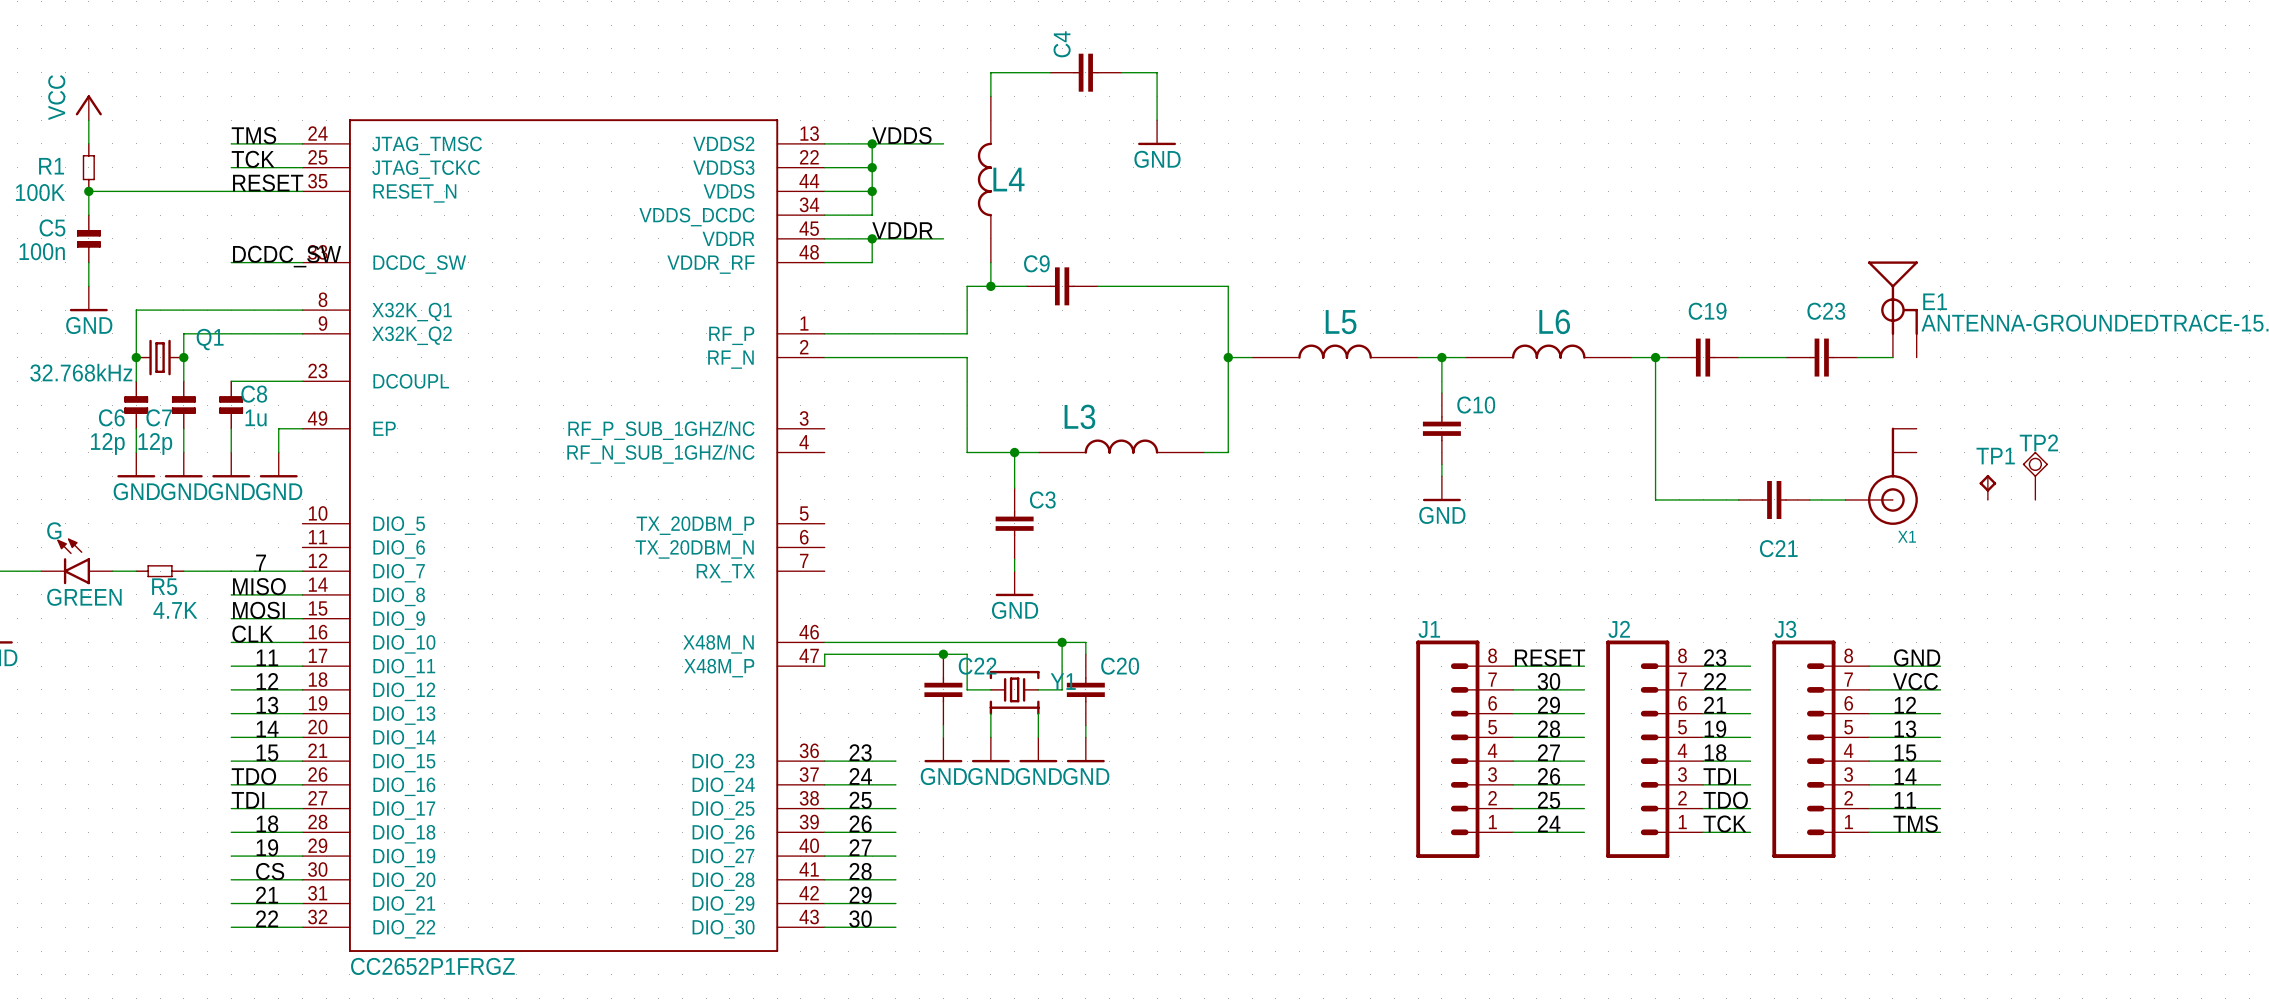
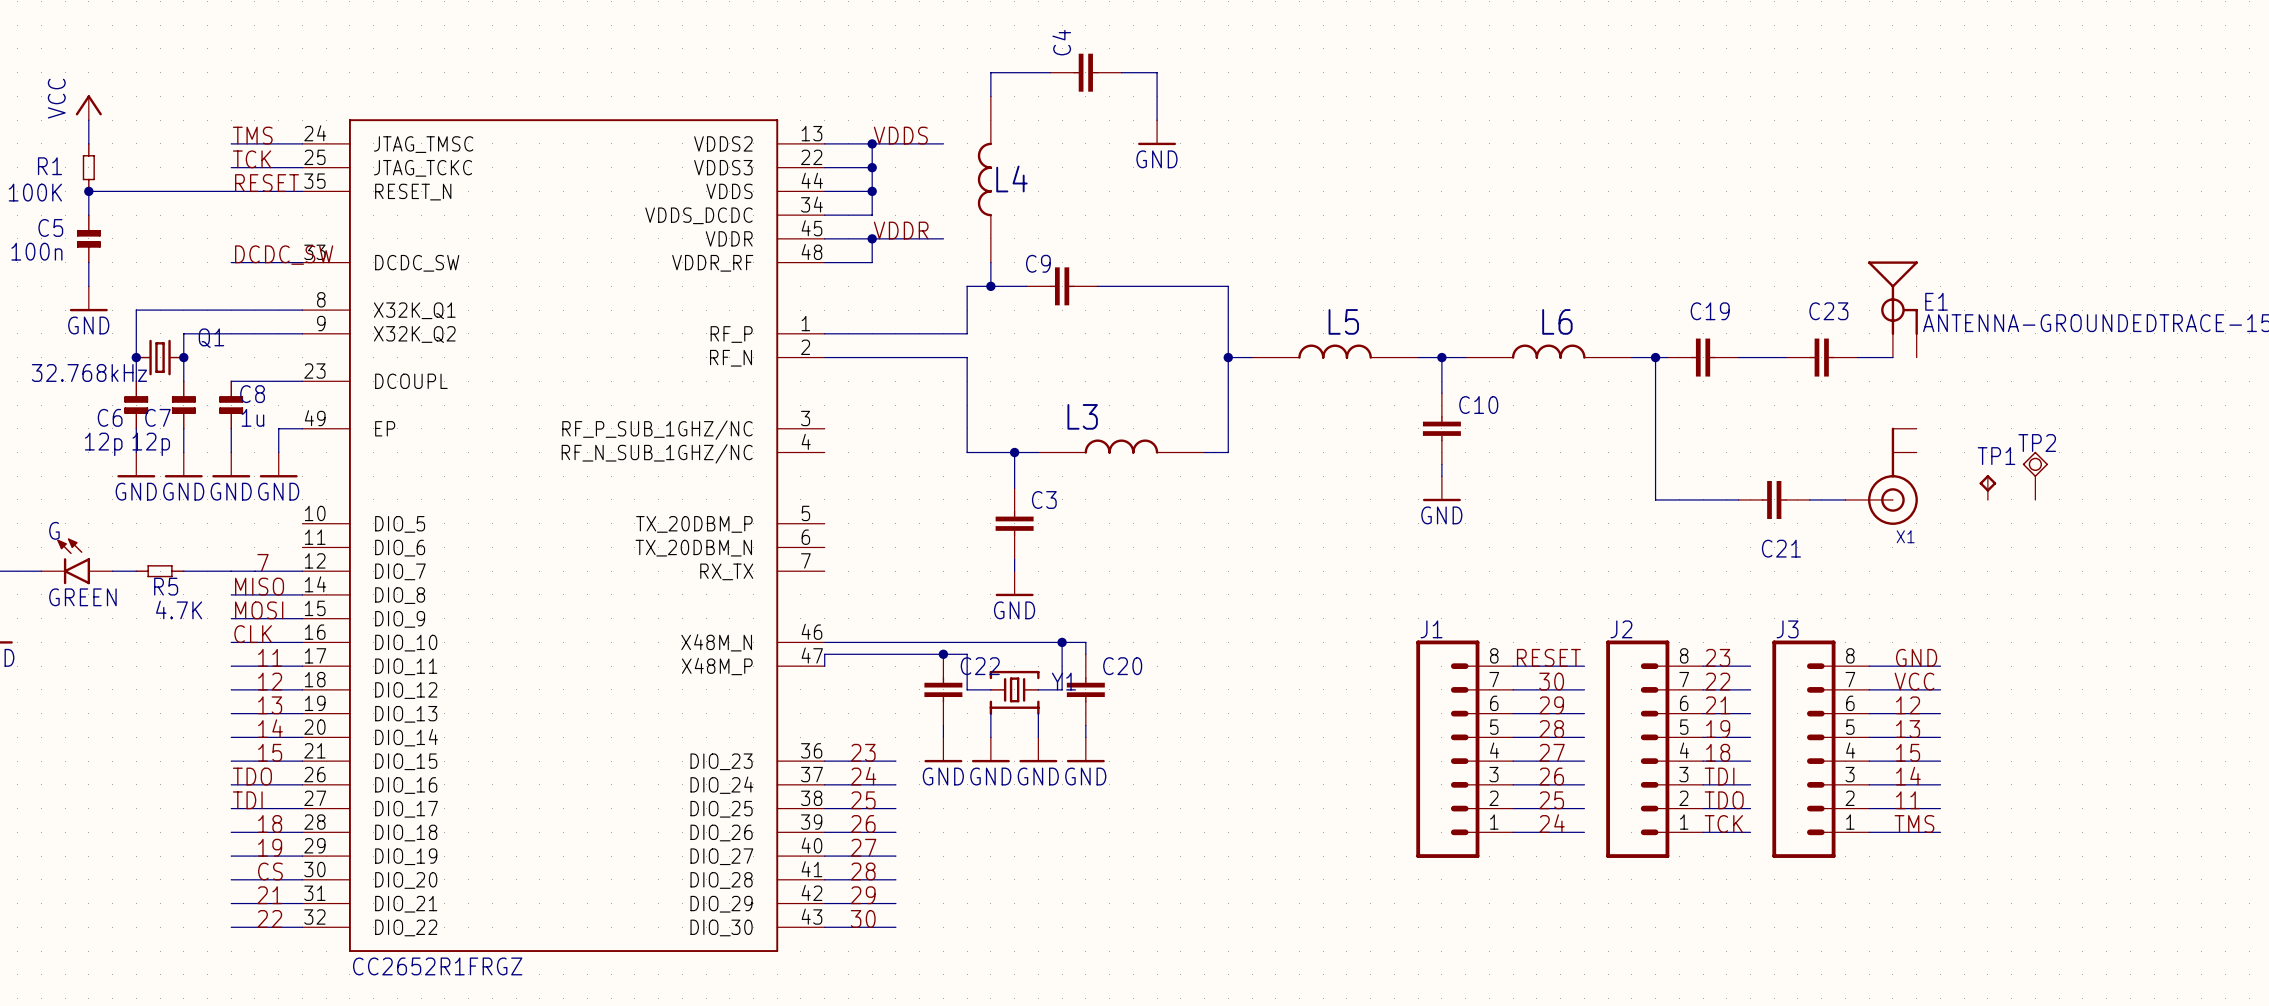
part value: CC2652P1FRGZ (432, 966) -> CC2652R1FRGZ (437, 966)

